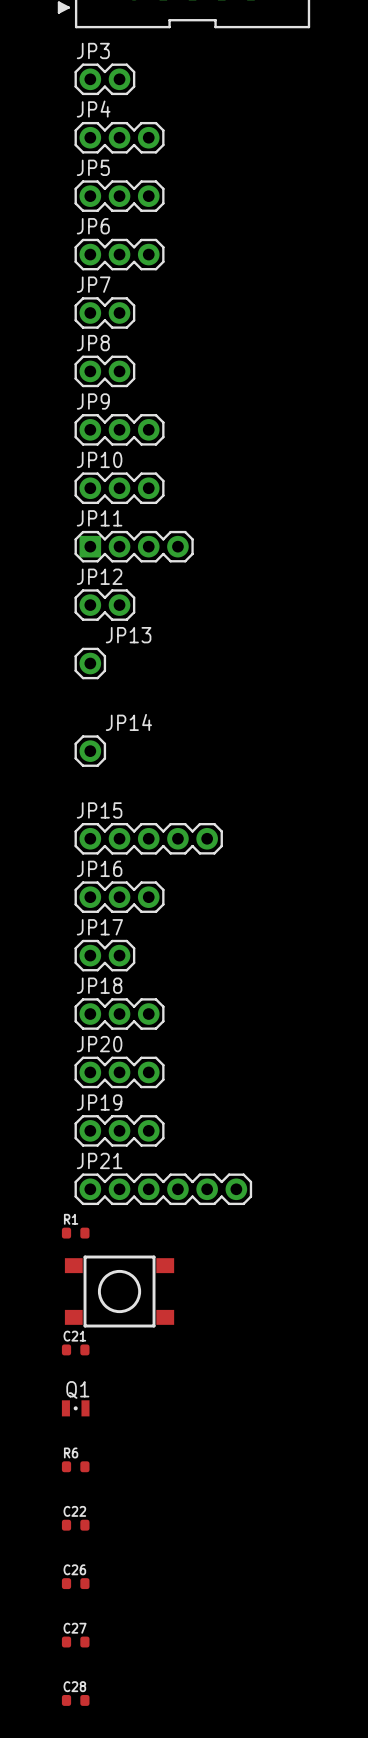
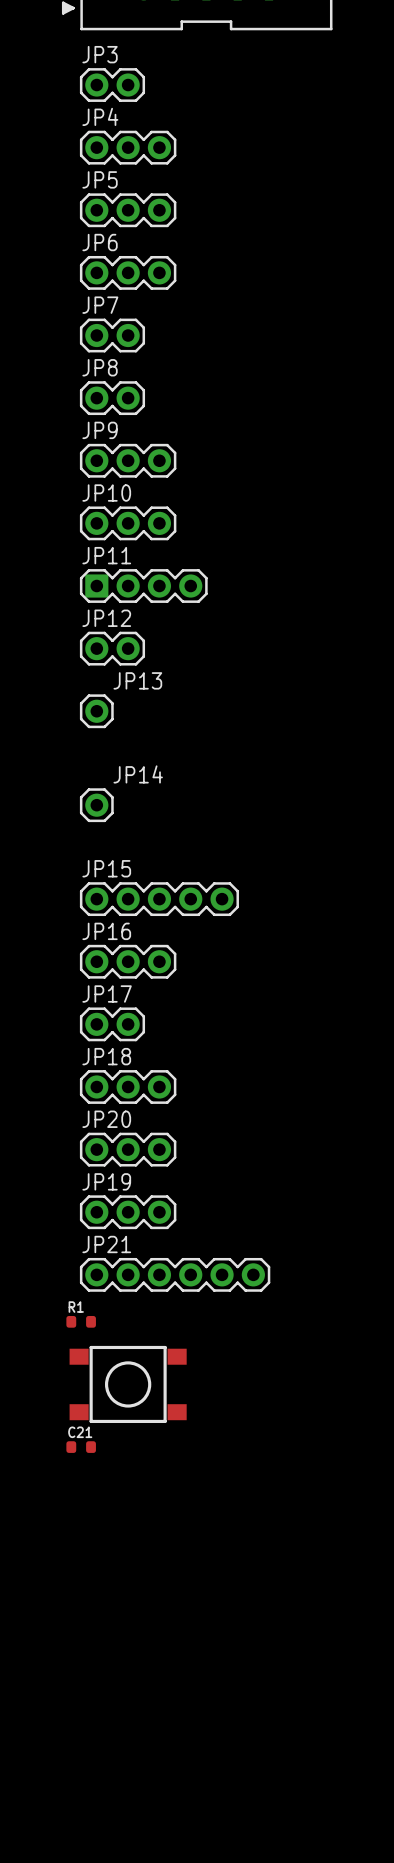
Q1: (75, 1408) -> none
R6: (75, 1466) -> none
C22: (75, 1525) -> none
C26: (75, 1583) -> none
C27: (75, 1642) -> none
C28: (75, 1700) -> none

